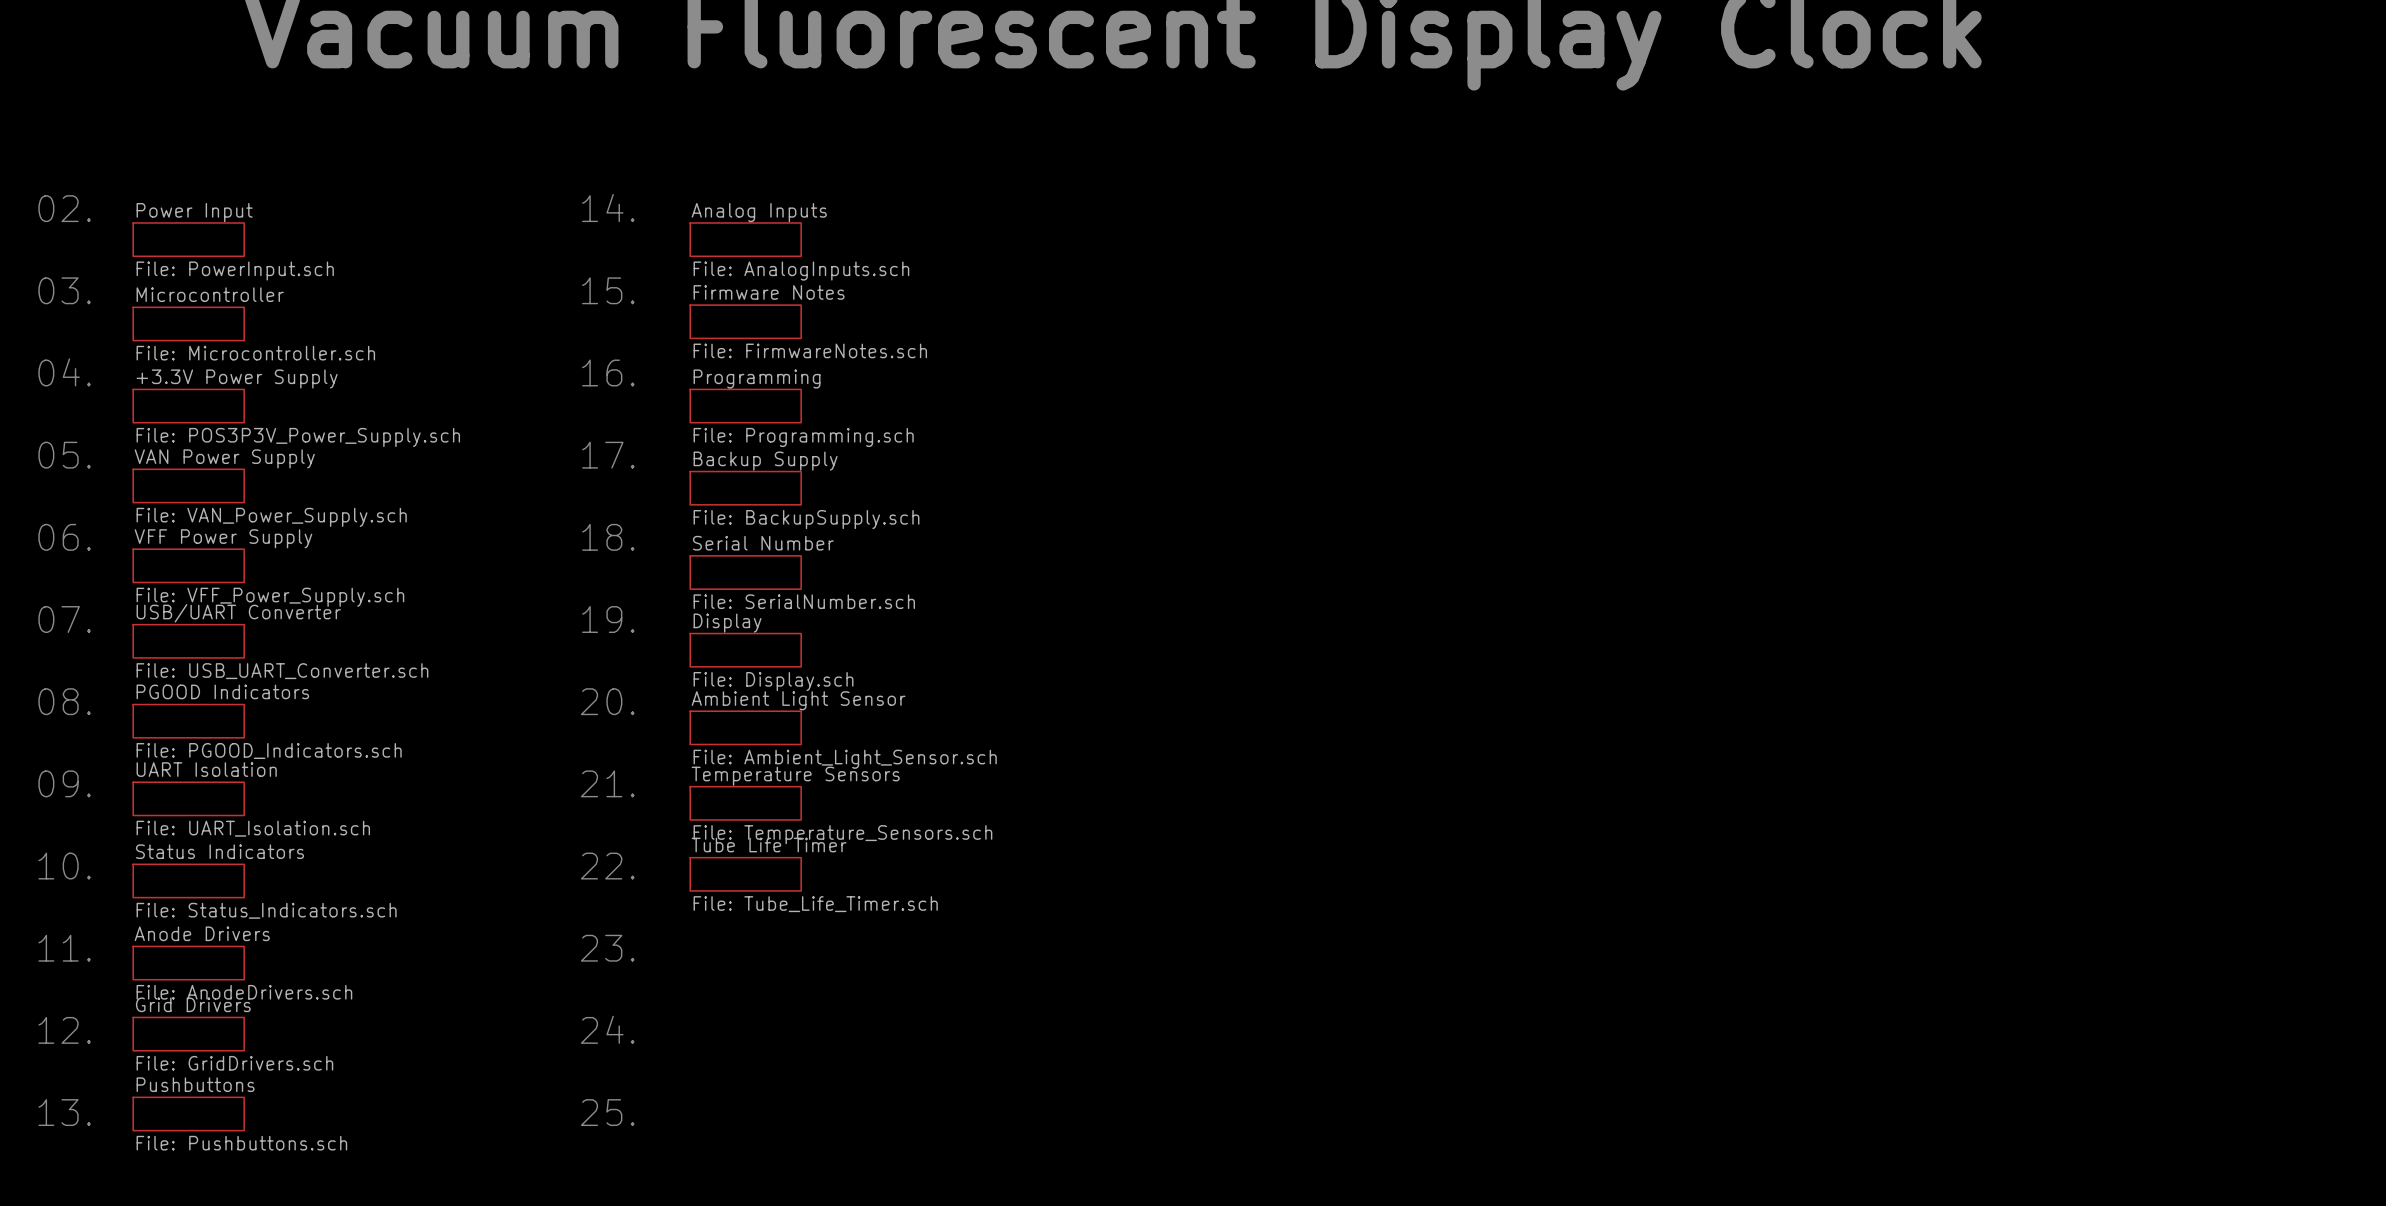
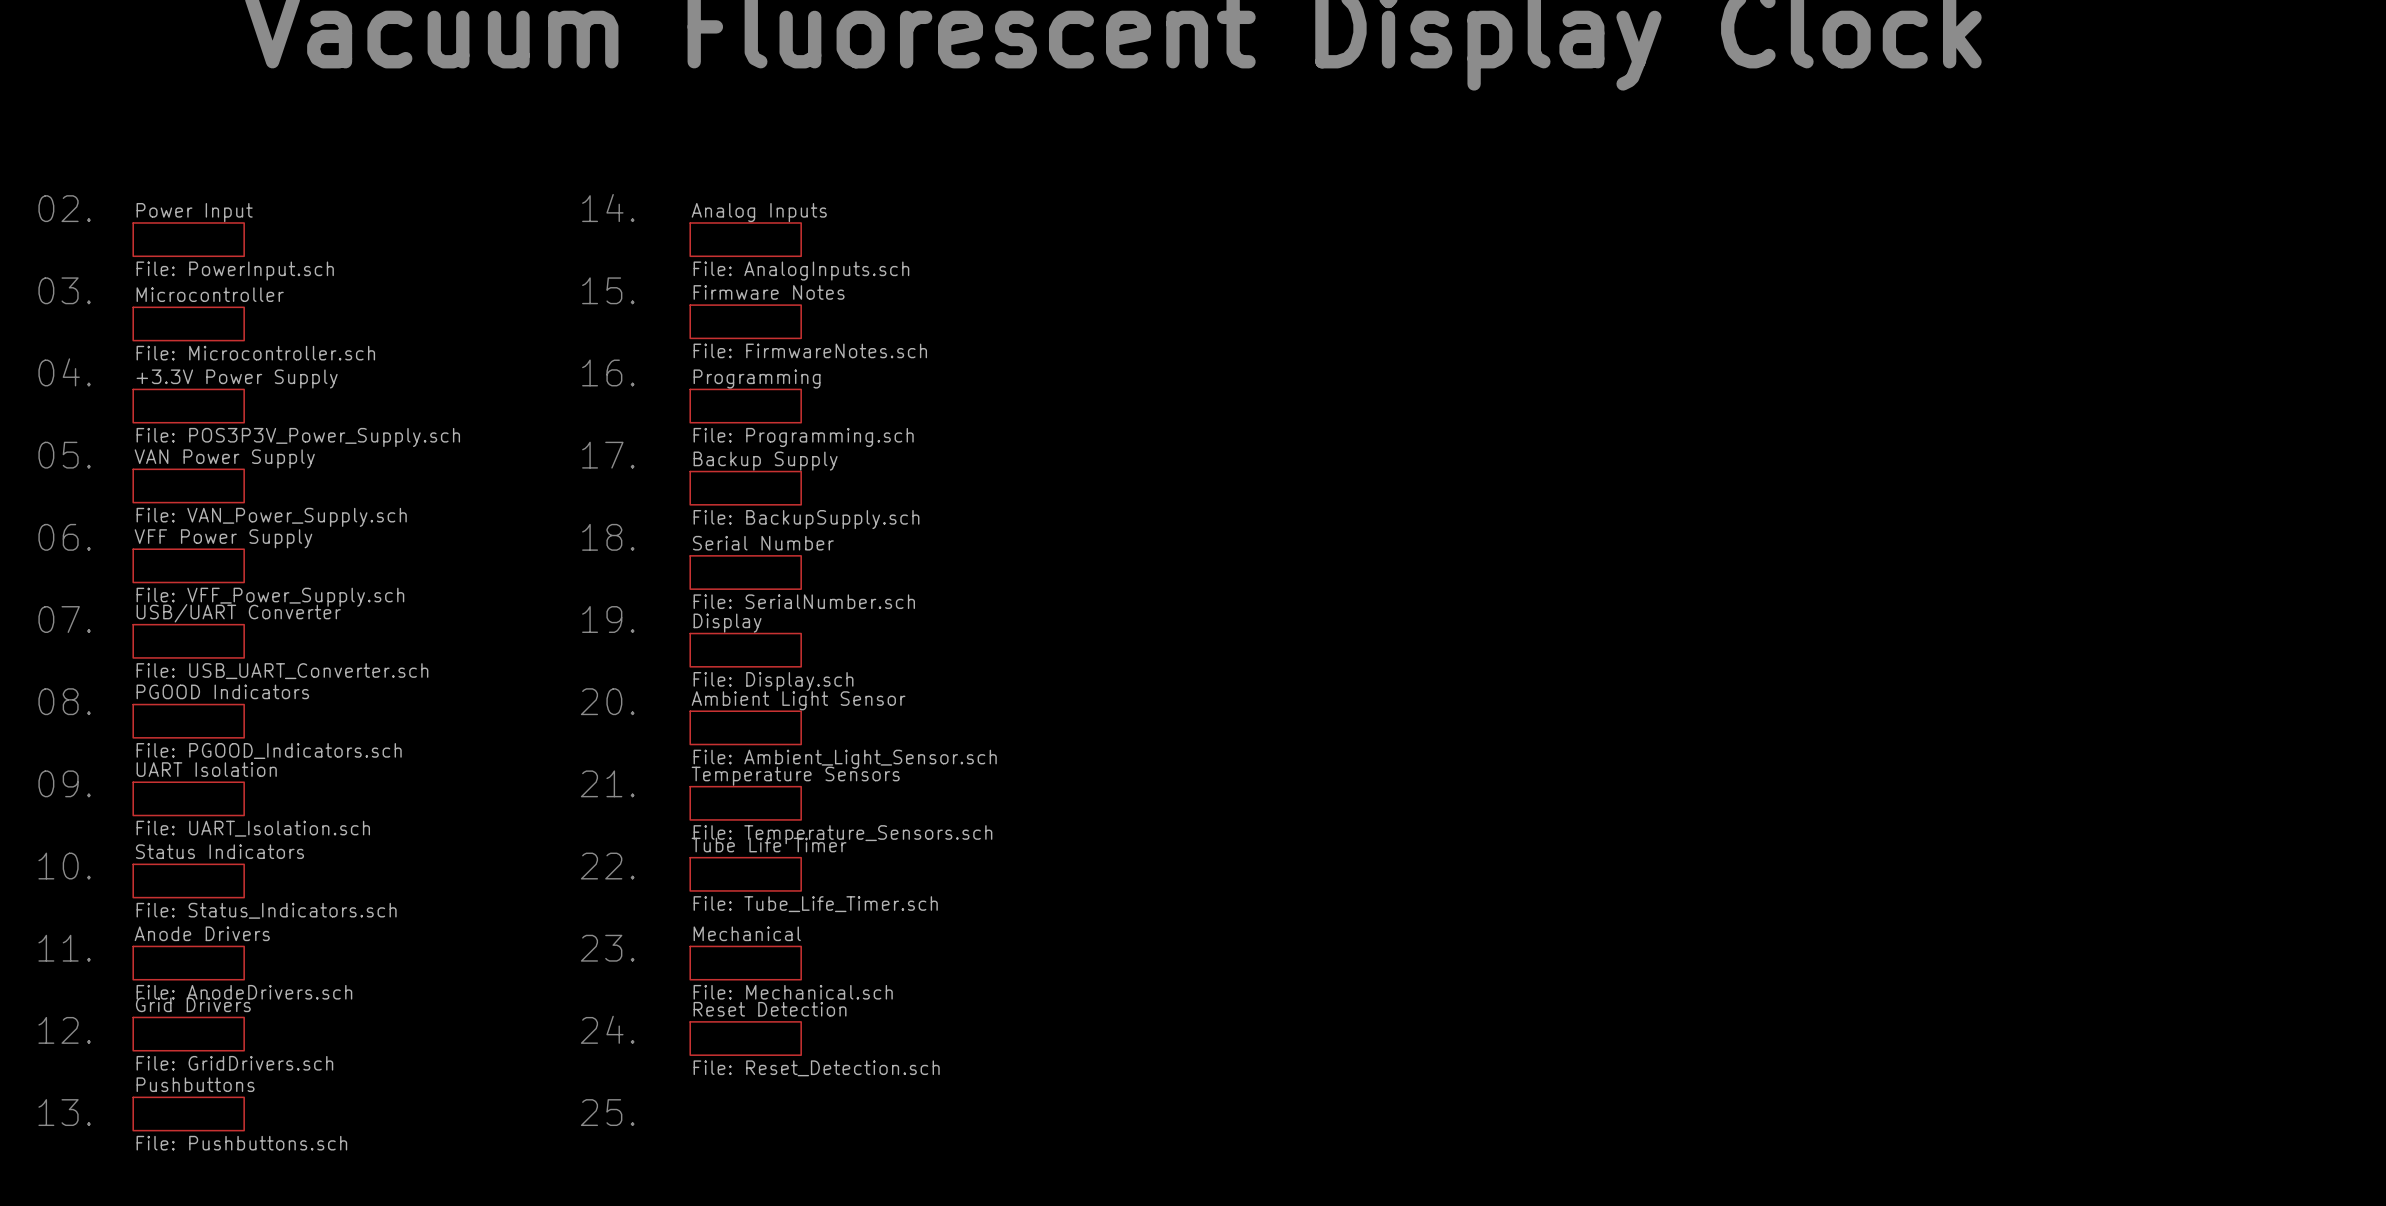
sheet Mechanical: none -> File: Mechanical.sch (745, 963)
sheet Reset Detection: none -> File: Reset_Detection.sch (745, 1038)

